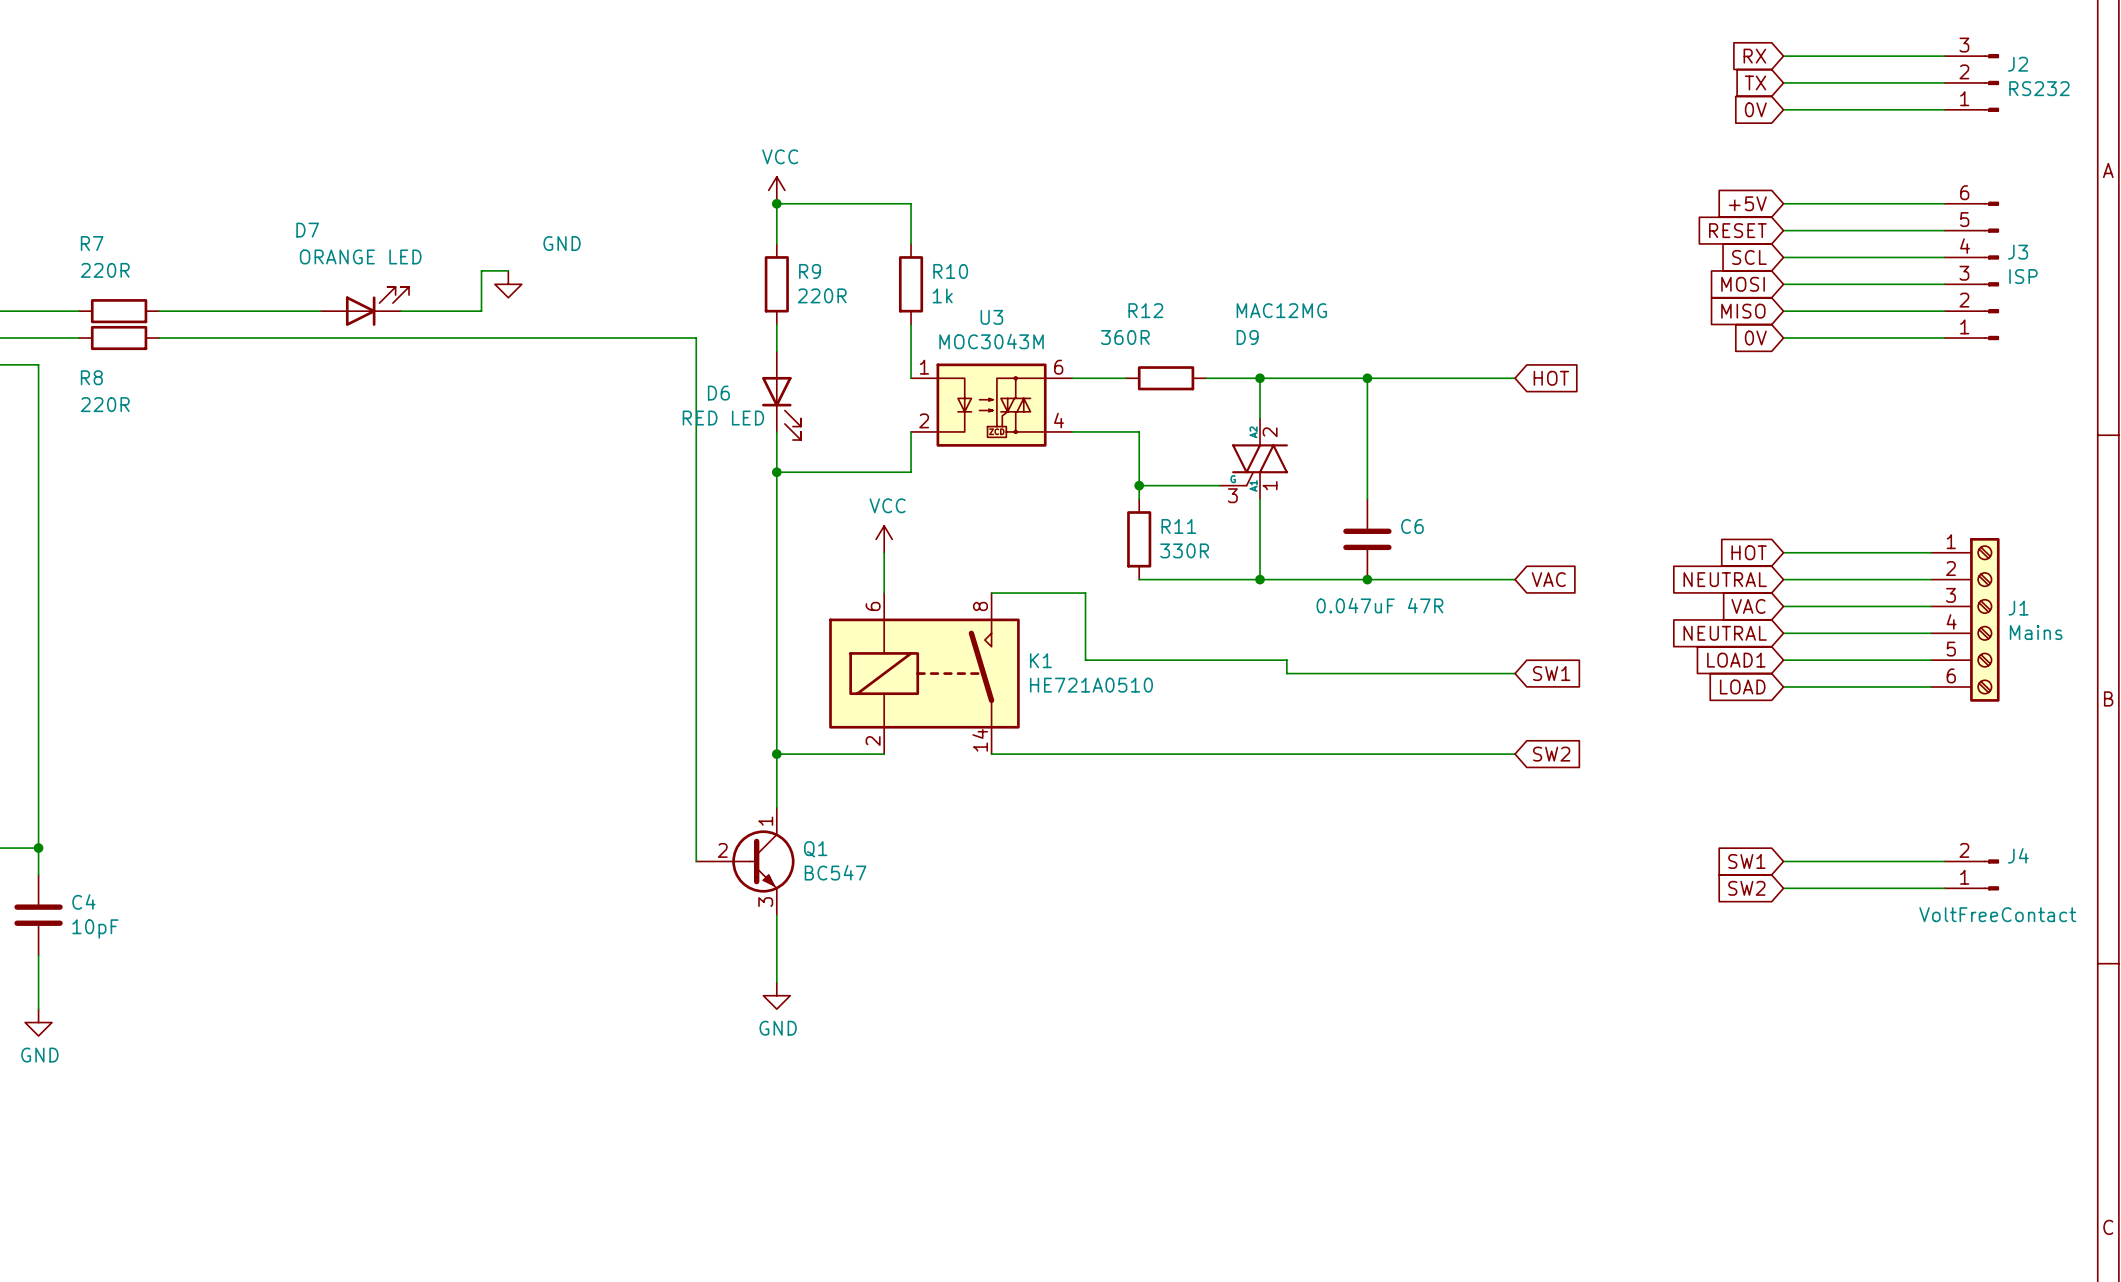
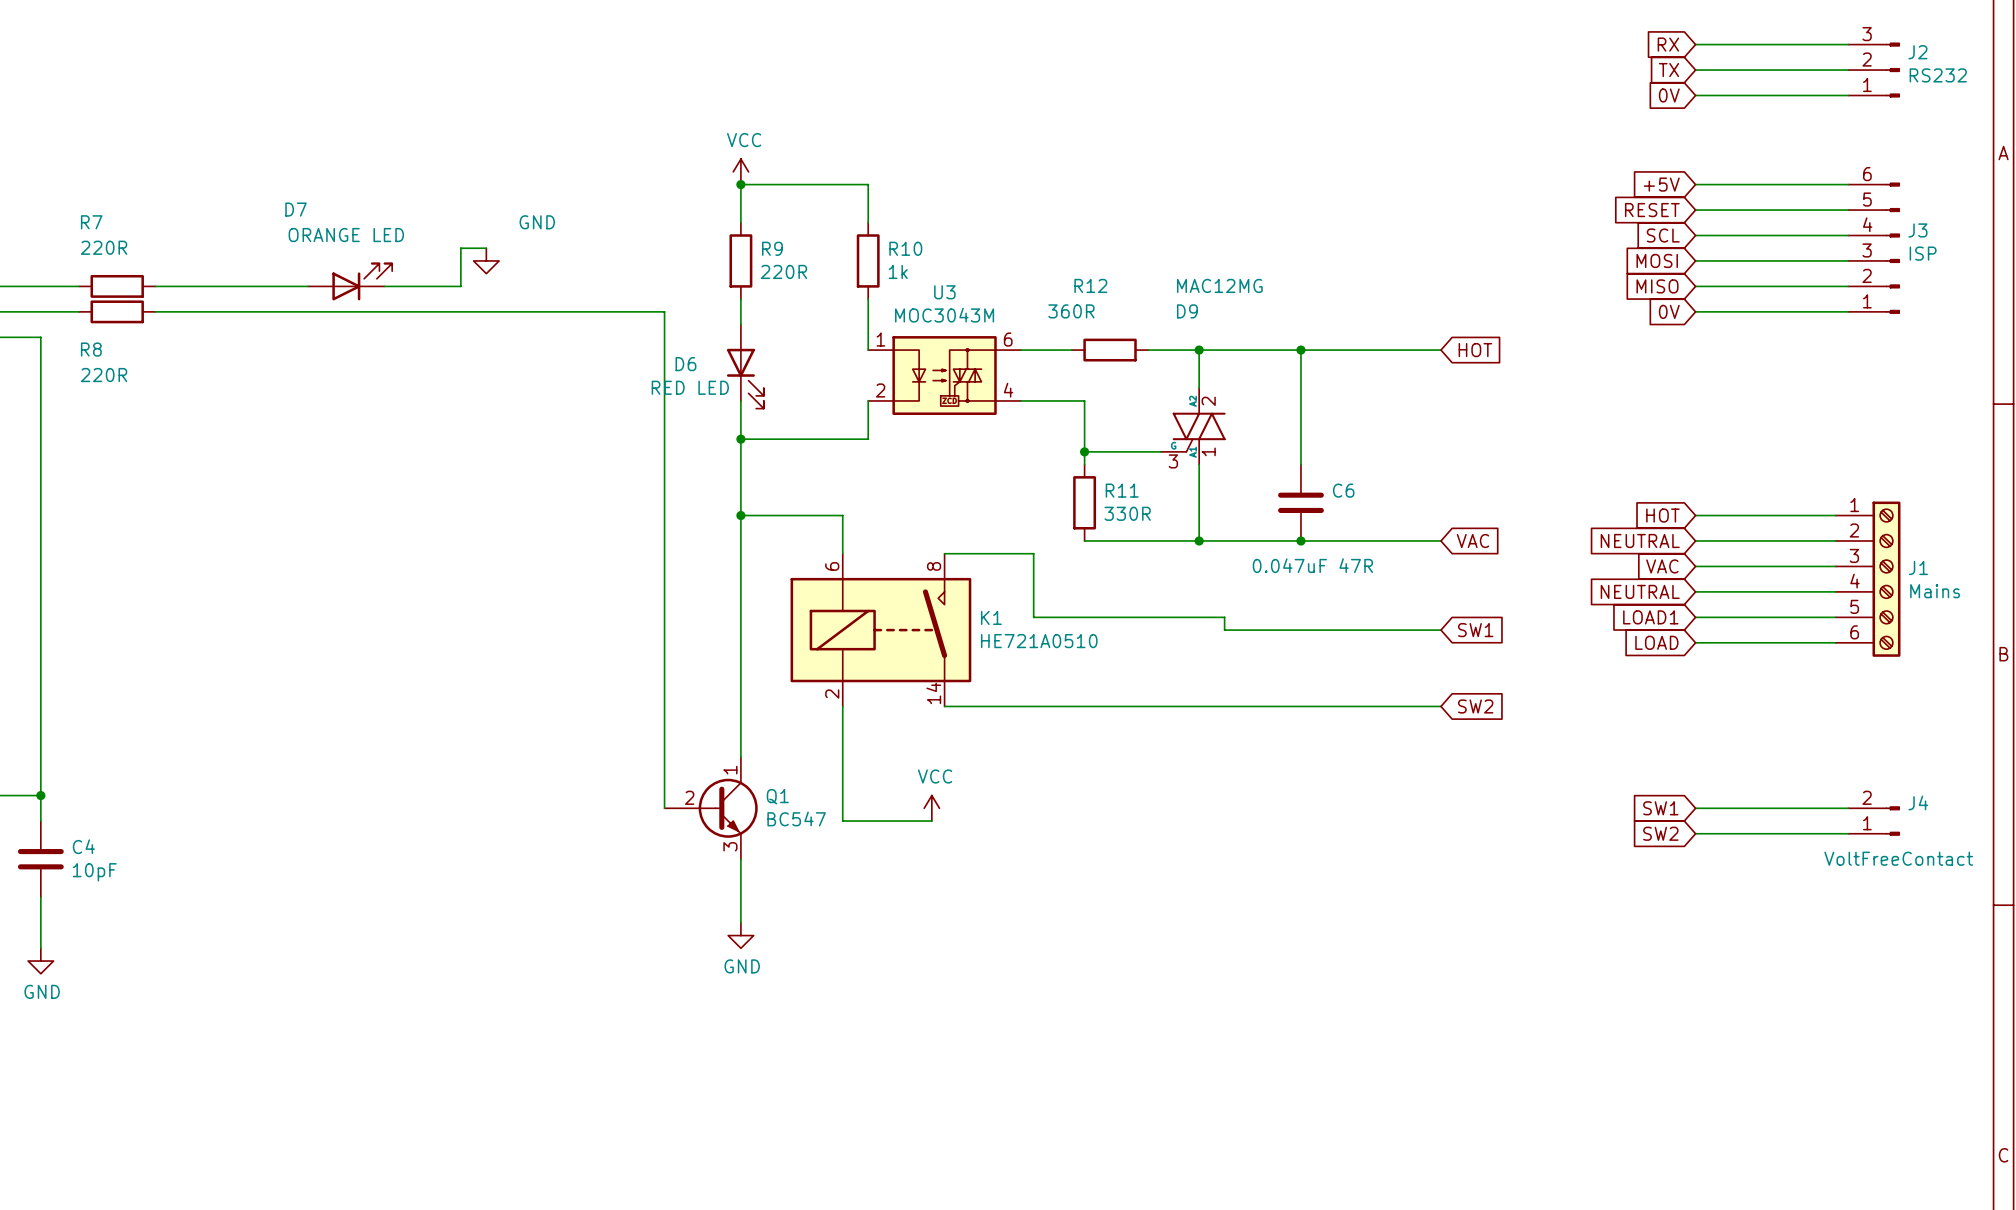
power symbol: VCC (884, 539) -> none
wire: none -> (740, 515) (842, 515)
junction: none -> (740, 515)
wire: (776, 754) (884, 754) -> (931, 821) (842, 821) (842, 706)
junction: (776, 754) -> none
power symbol: none -> VCC (931, 808)

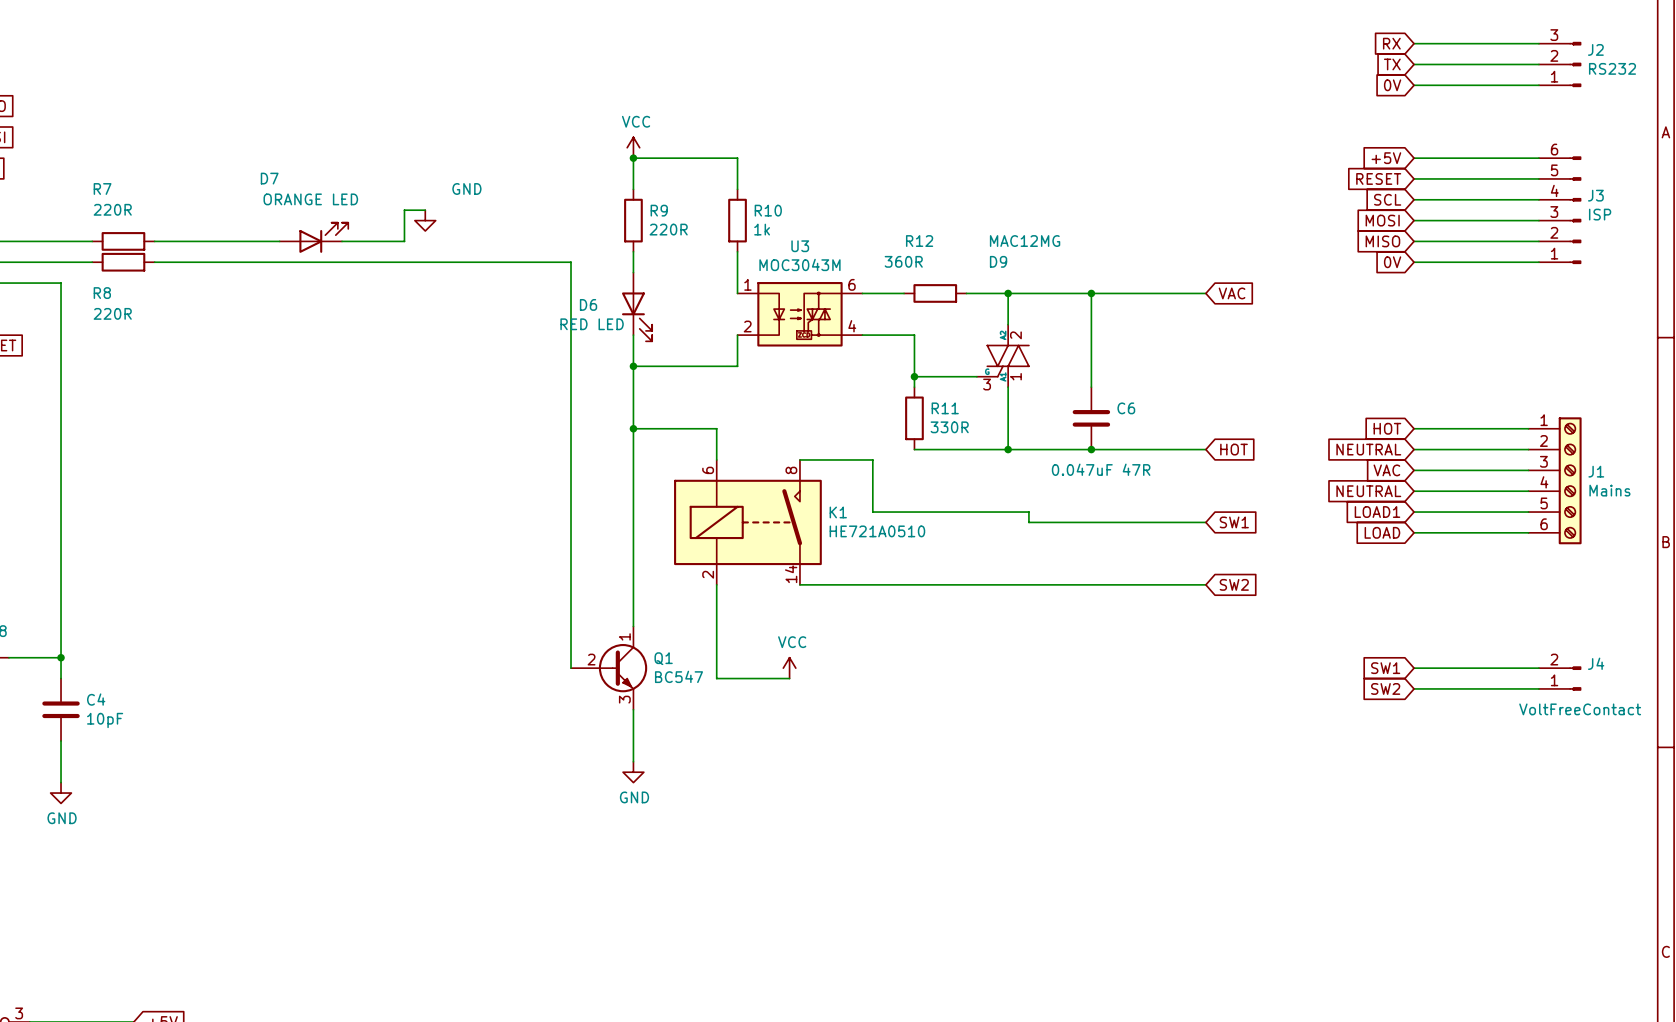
global label: HOT (1475, 350) -> VAC (1232, 293)
global label: VAC (1472, 540) -> HOT (1234, 449)

